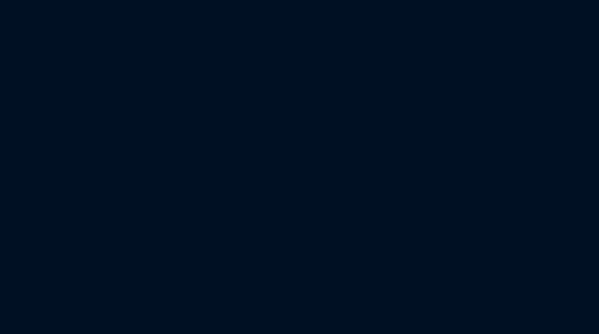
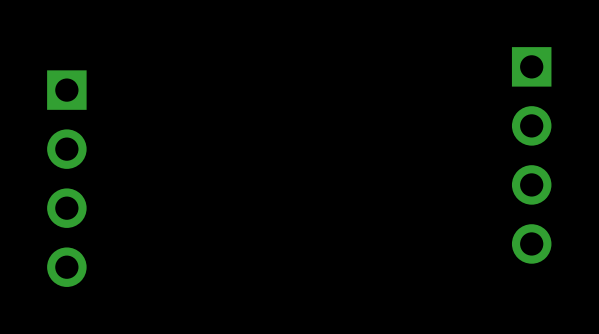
part: none -> (531, 155)
part: none -> (66, 178)

